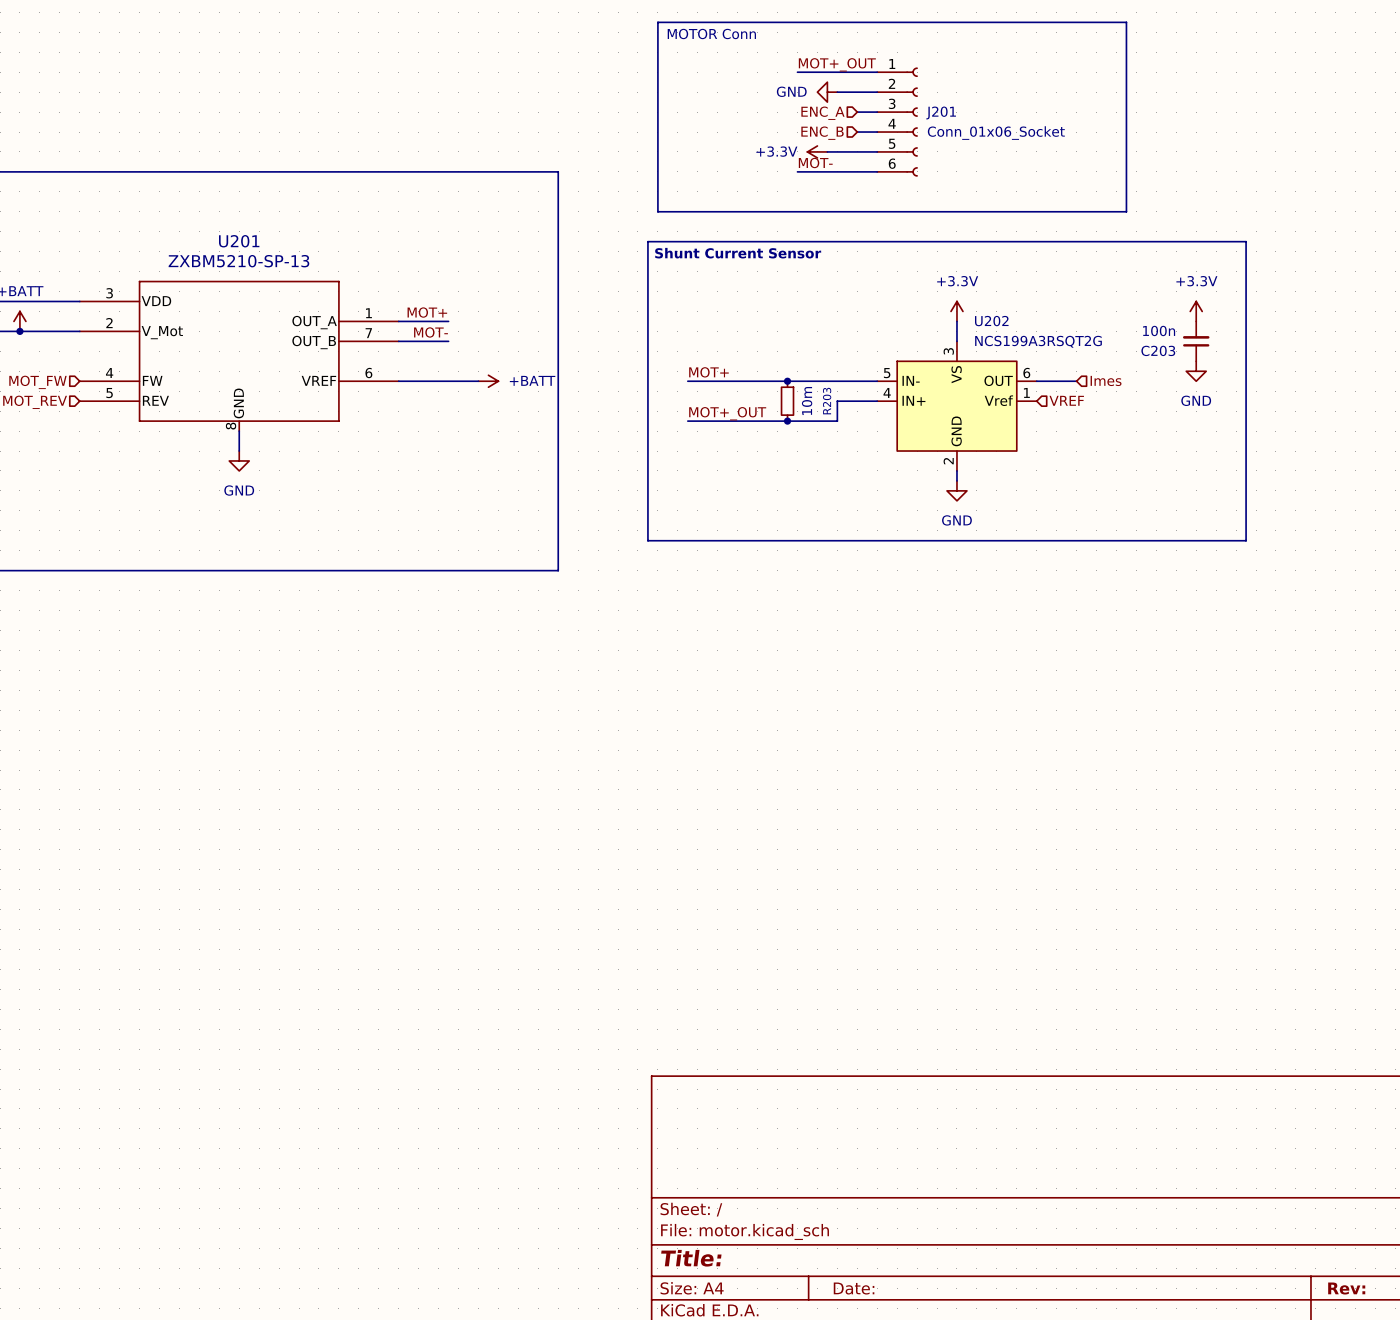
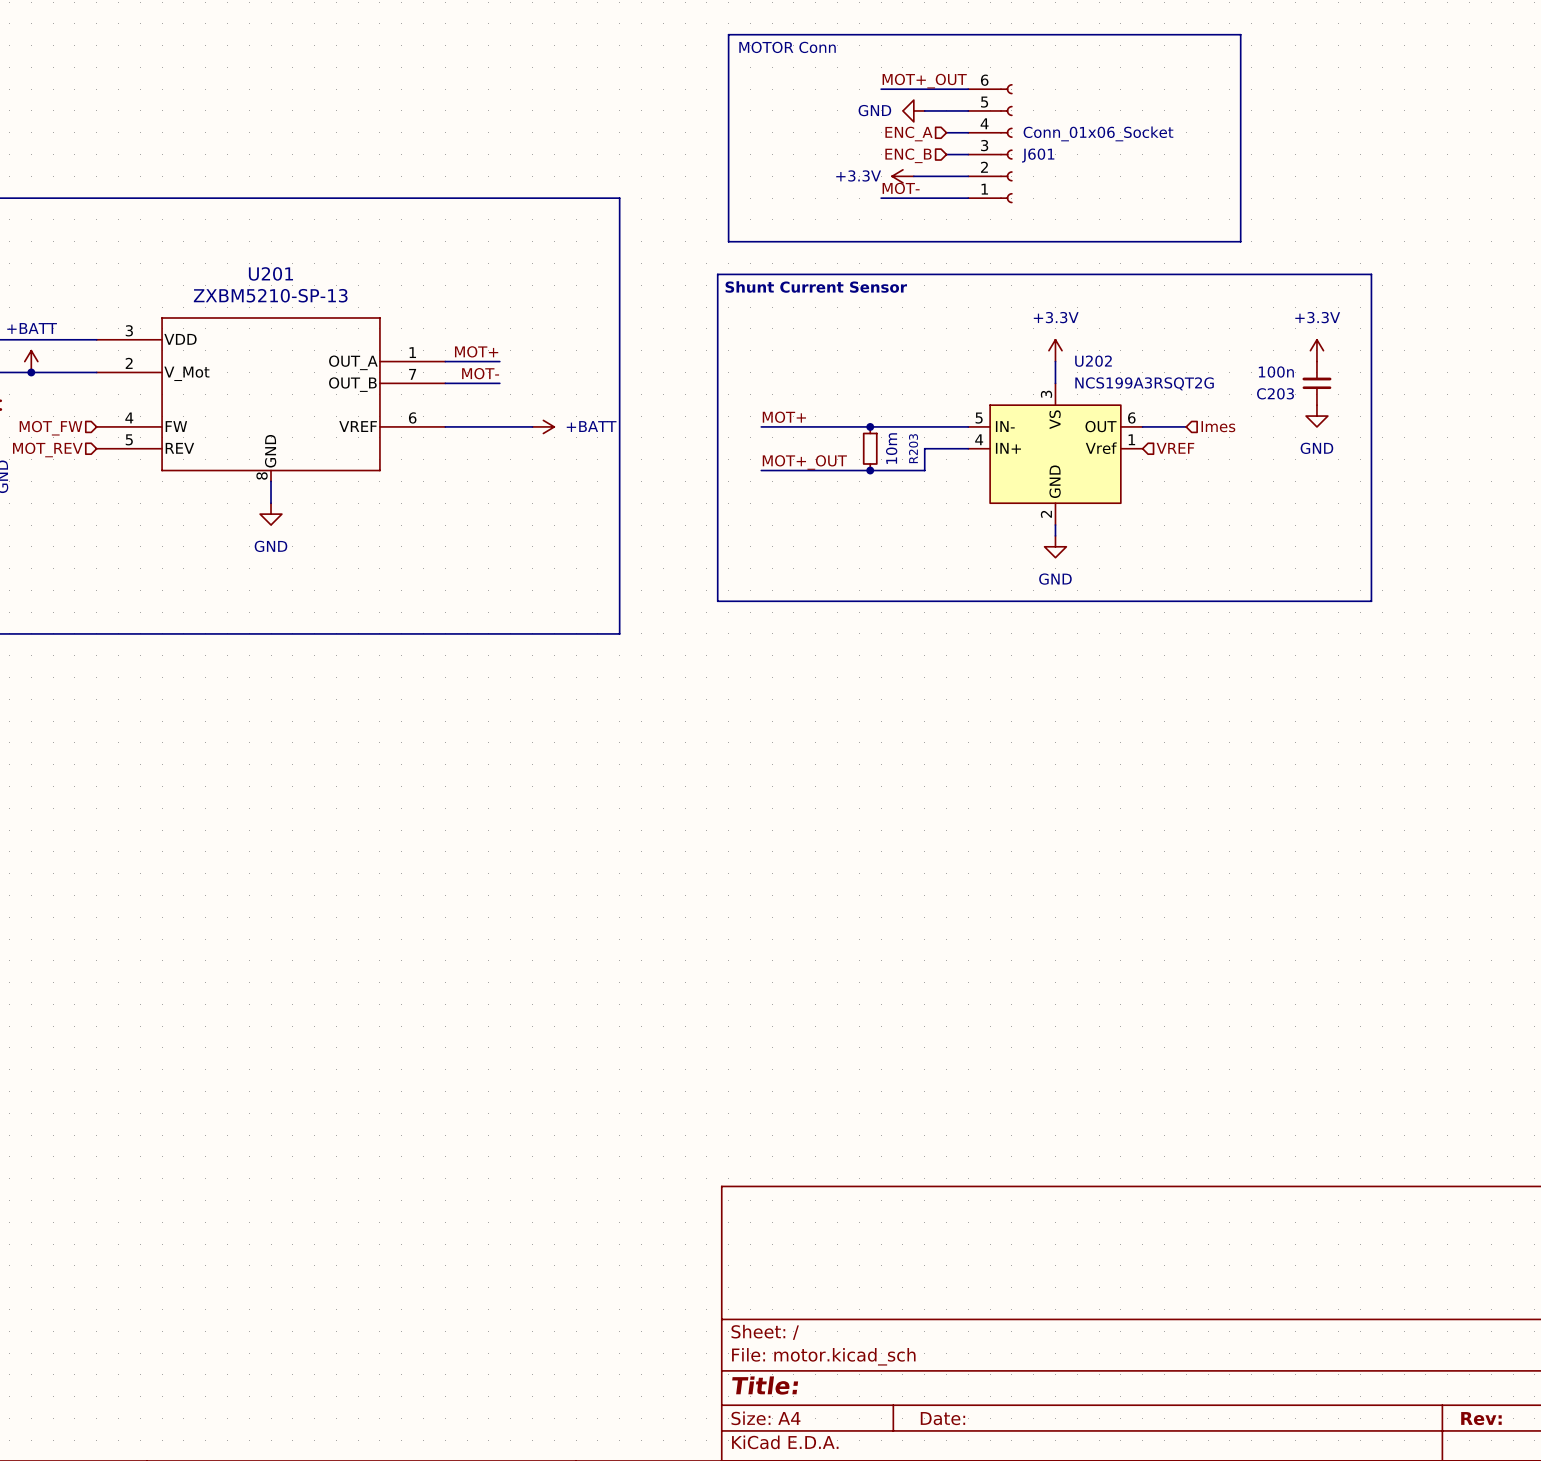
J201 name: J201 (941, 112) -> J601 (1038, 155)
J201 flip: as is (912, 122) -> up-down (1006, 143)

